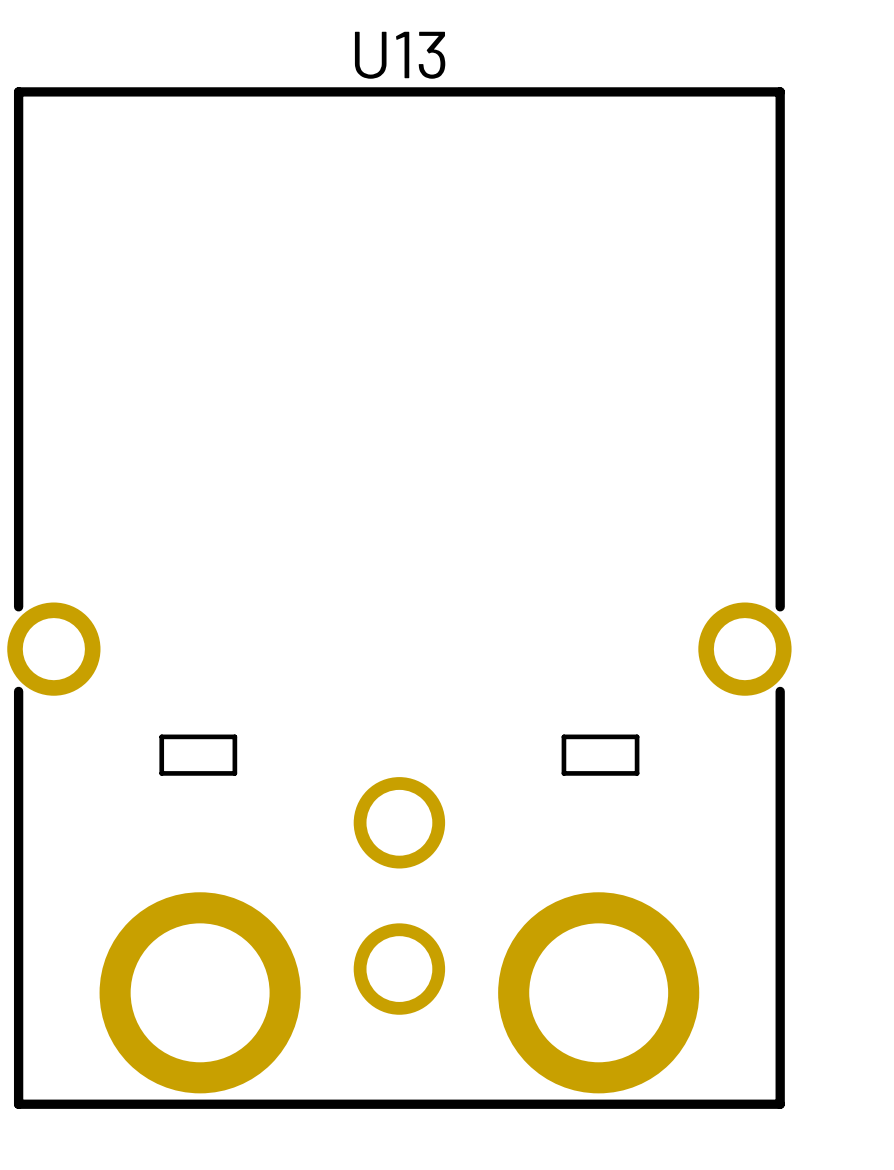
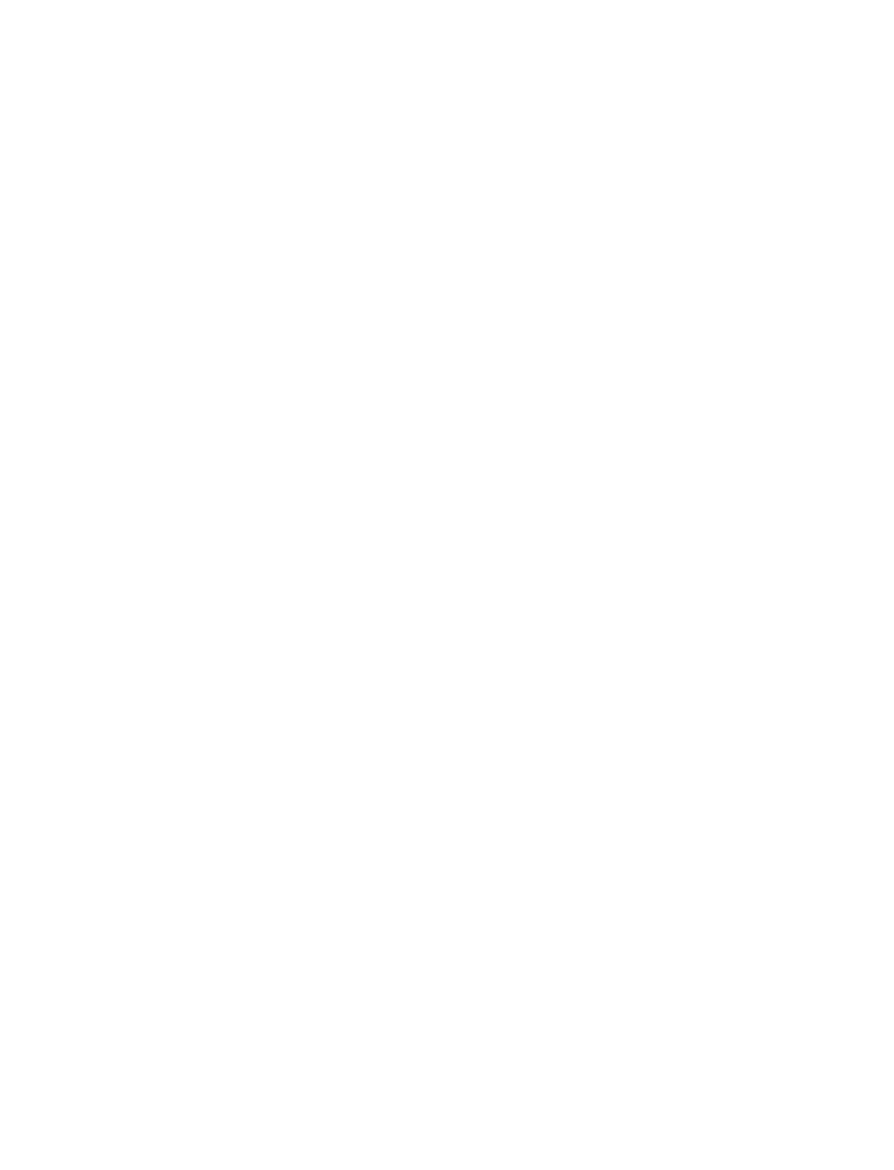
U13: (399, 598) -> none

